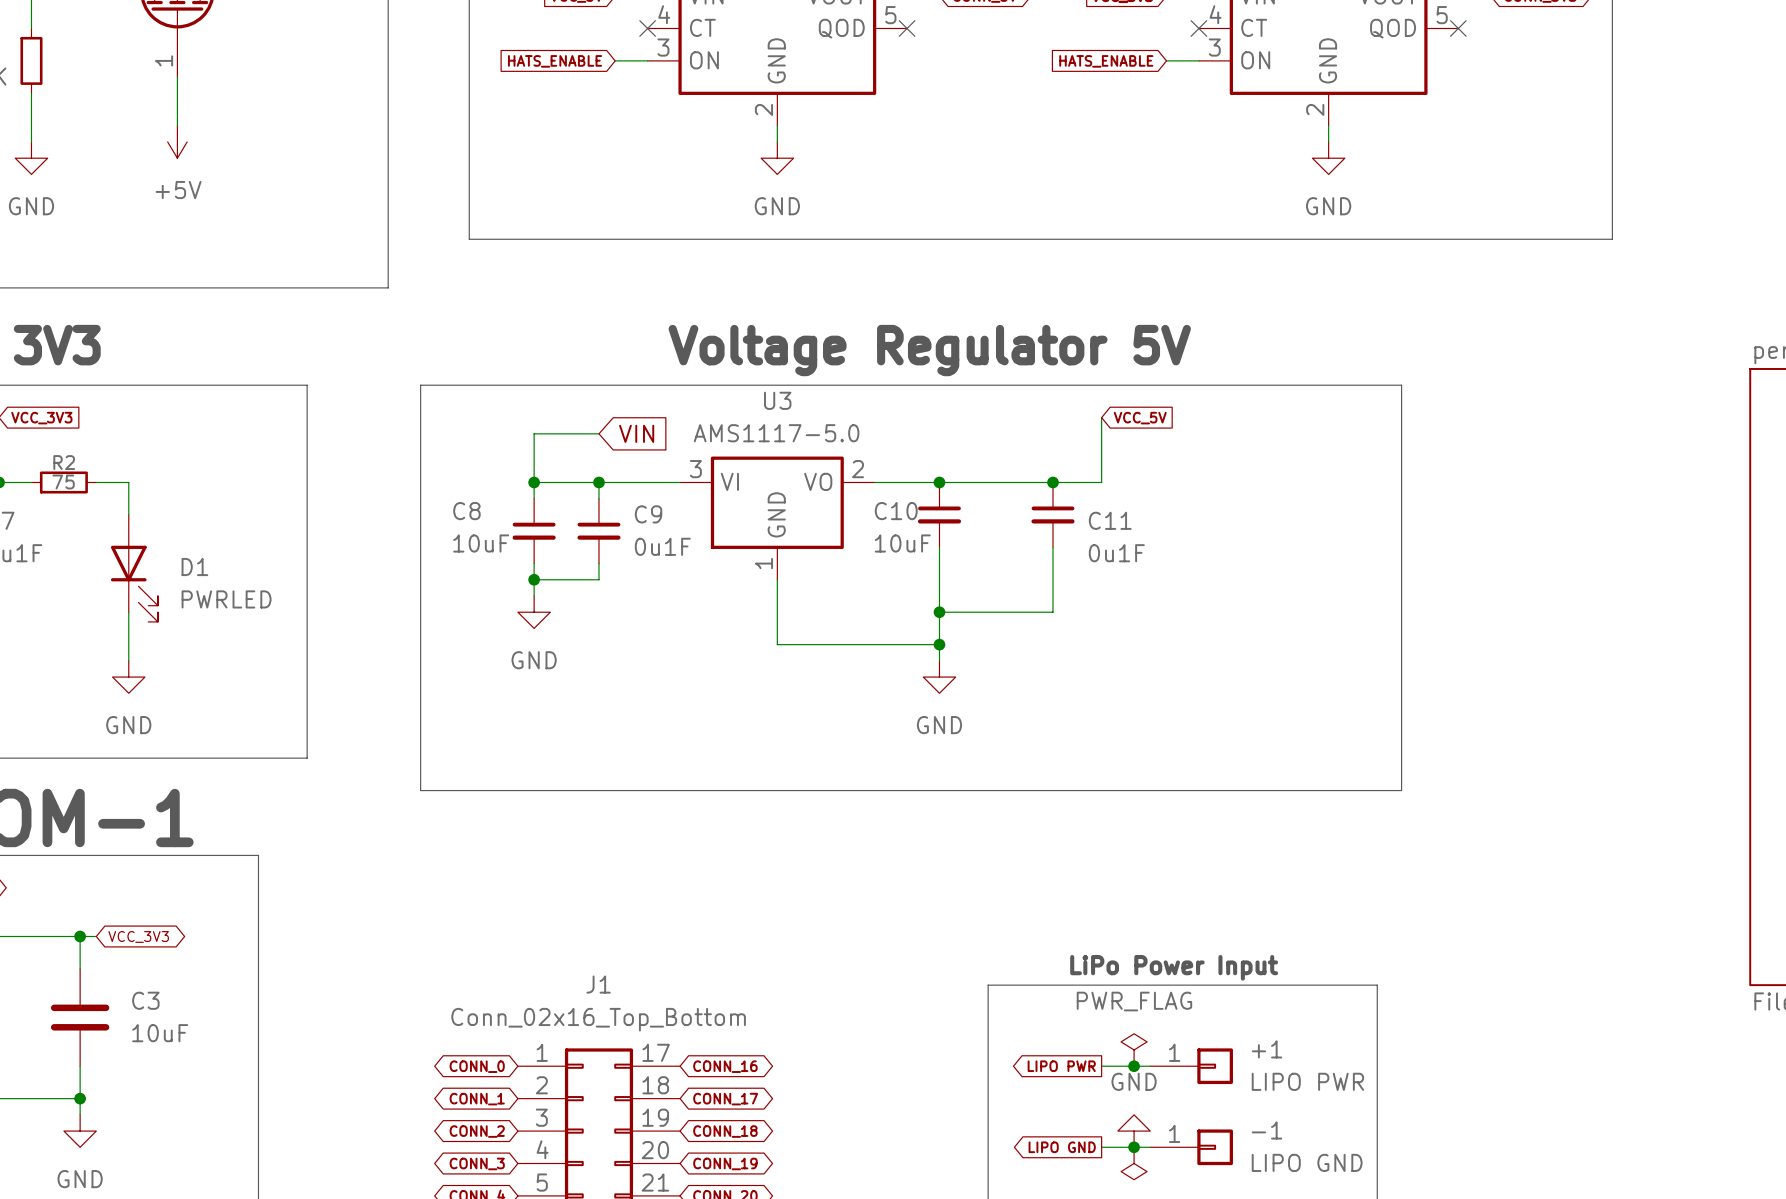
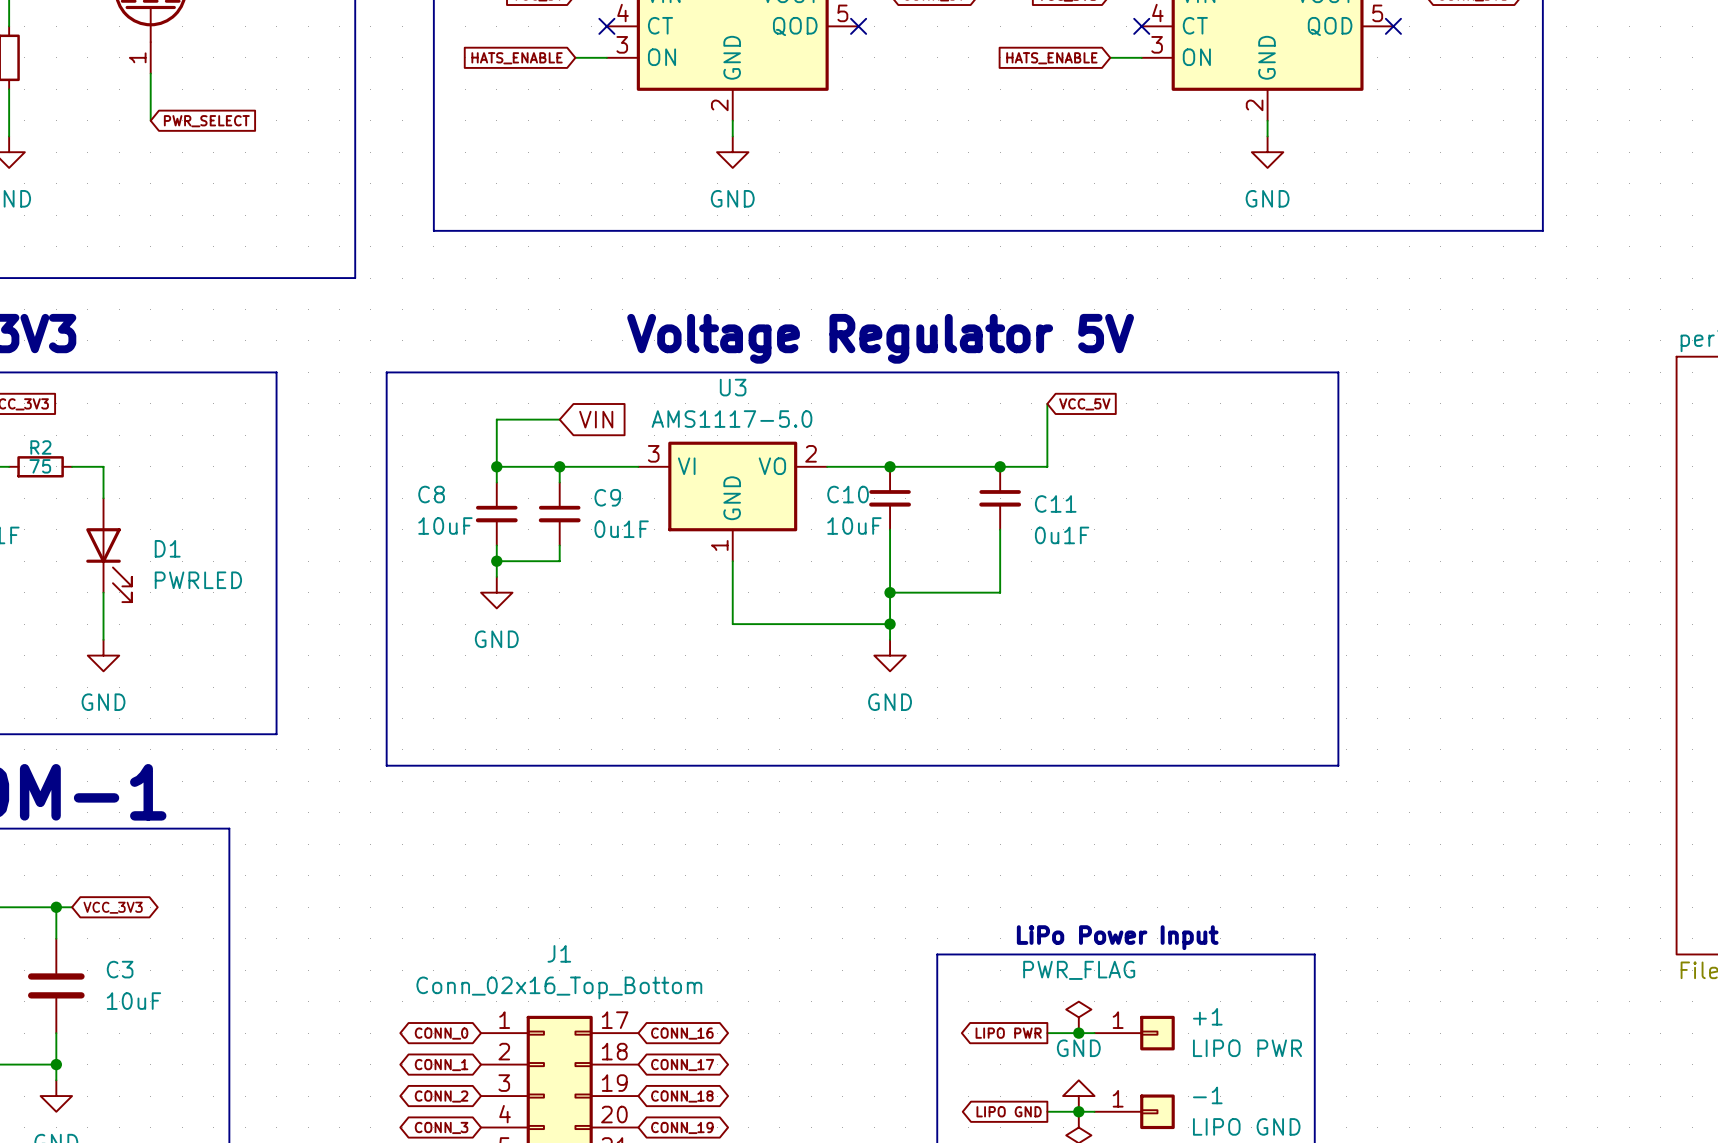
global label: none -> PWR_SELECT (206, 121)
power symbol: +5V (177, 141) -> none

